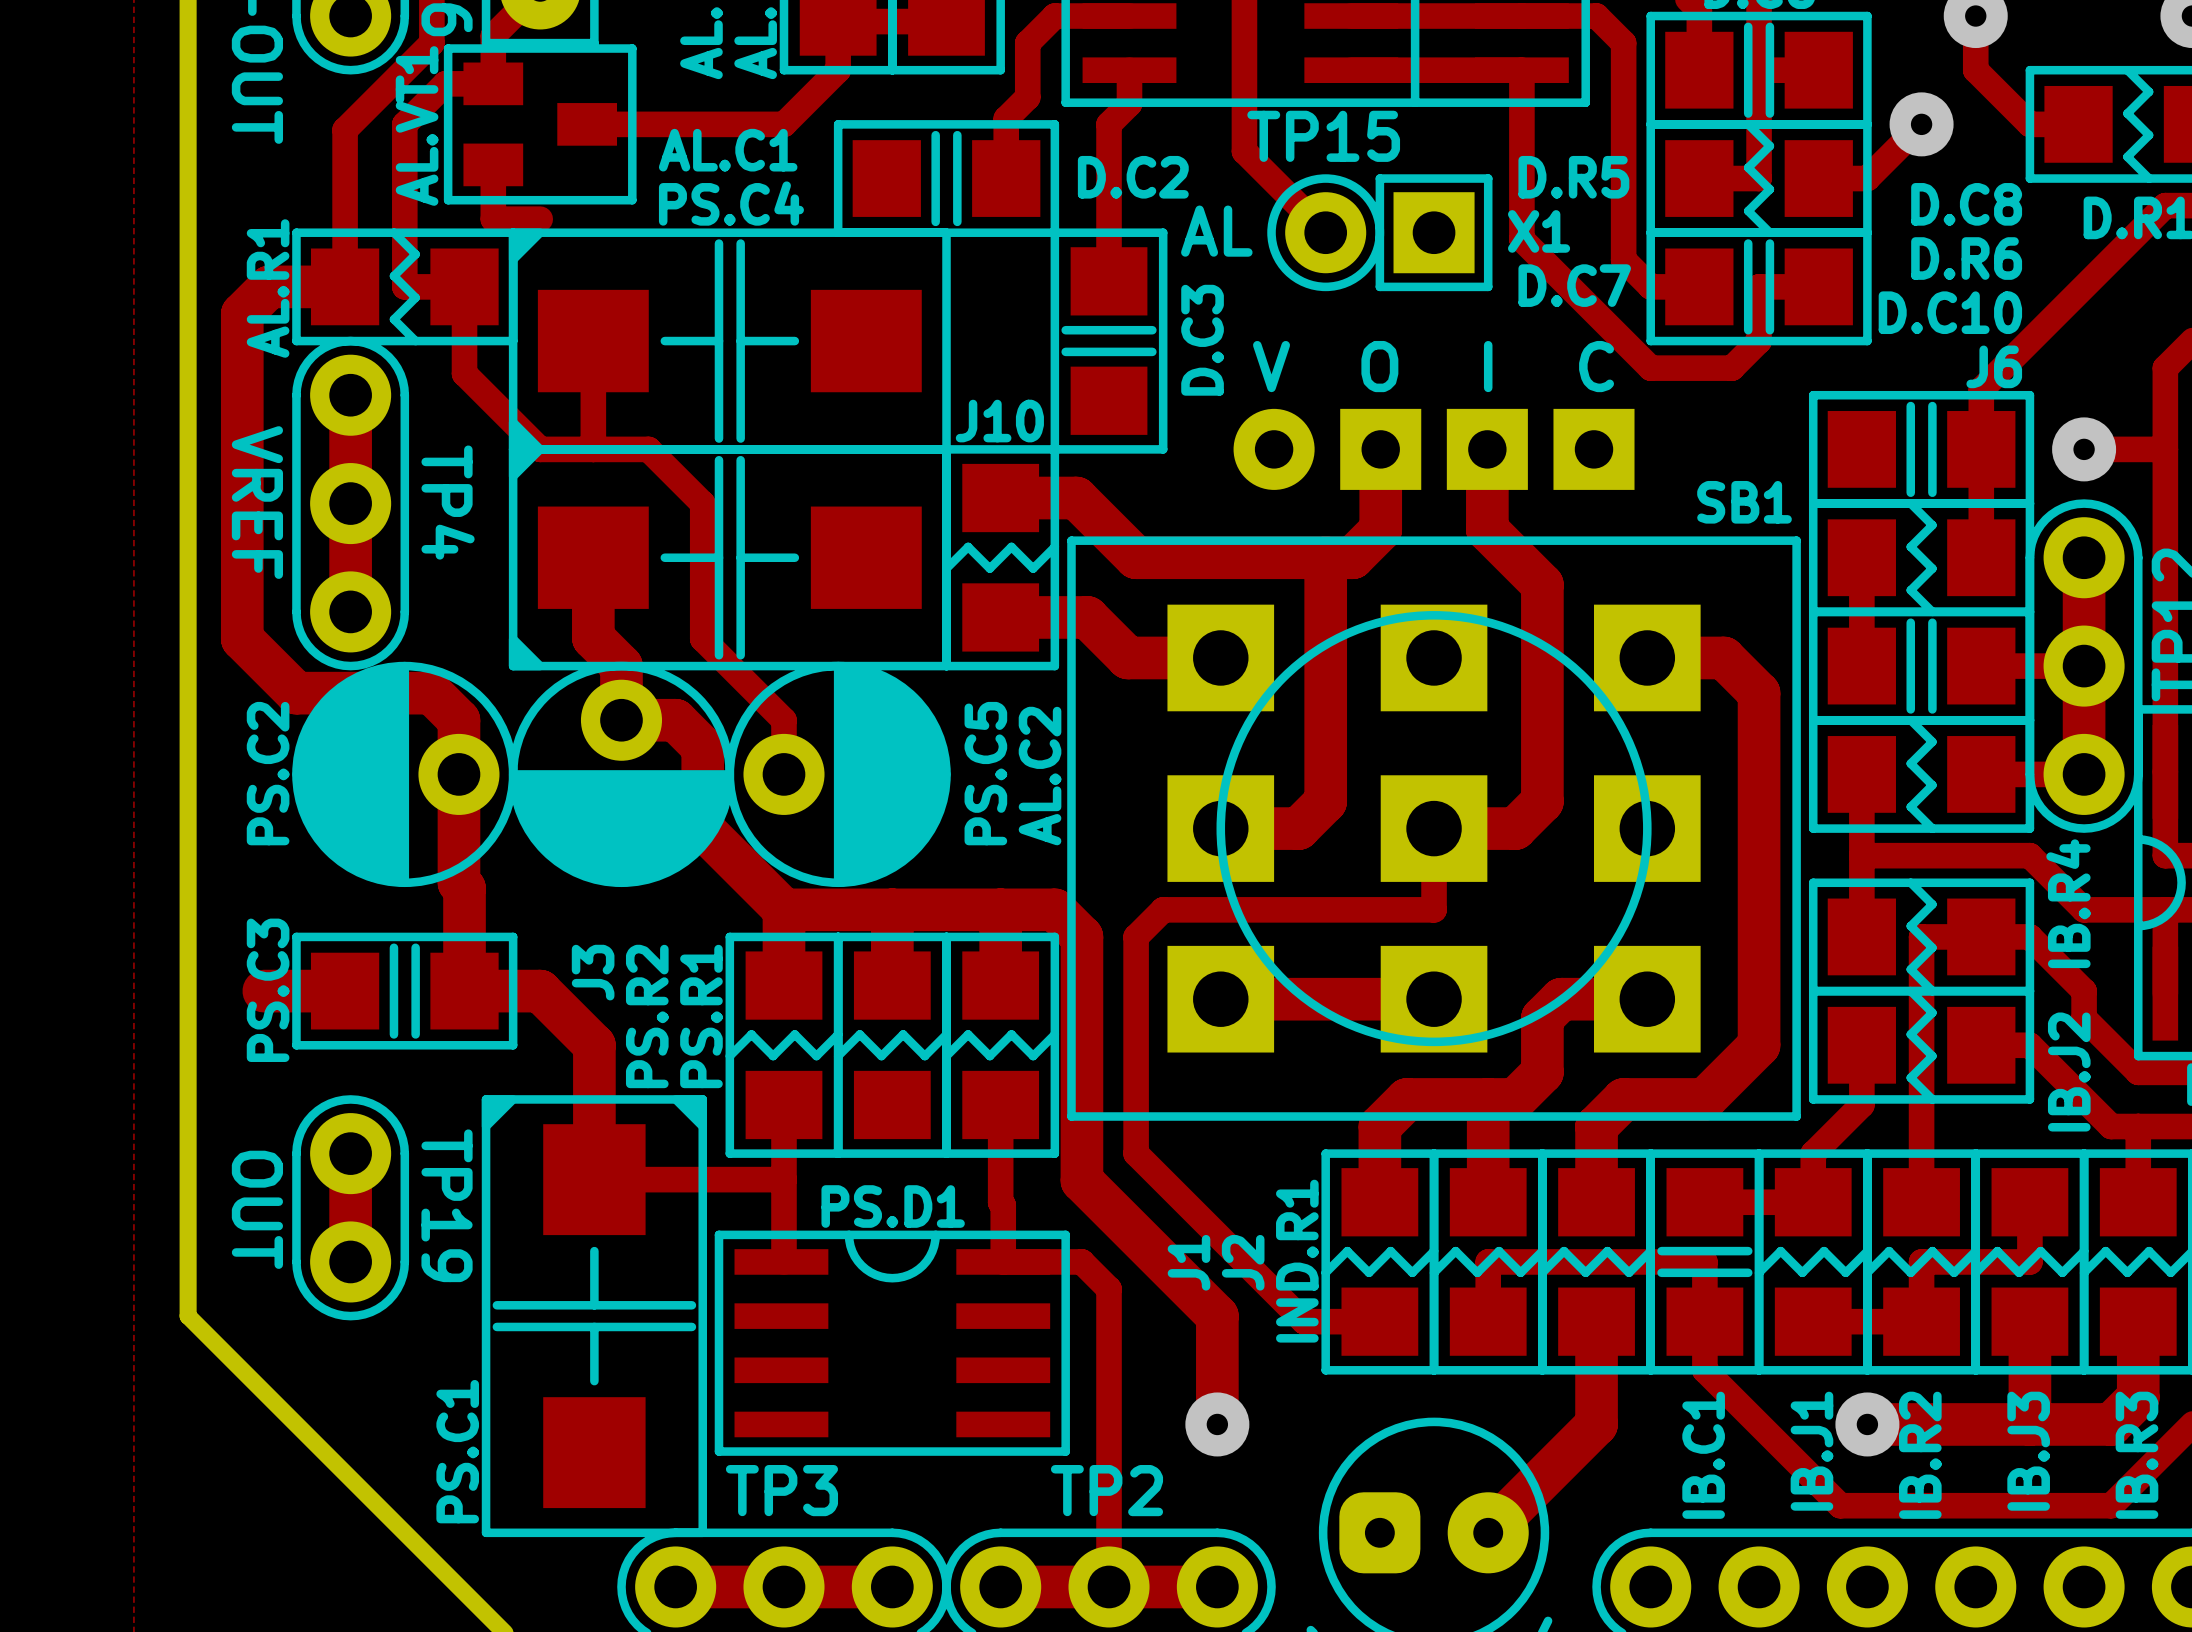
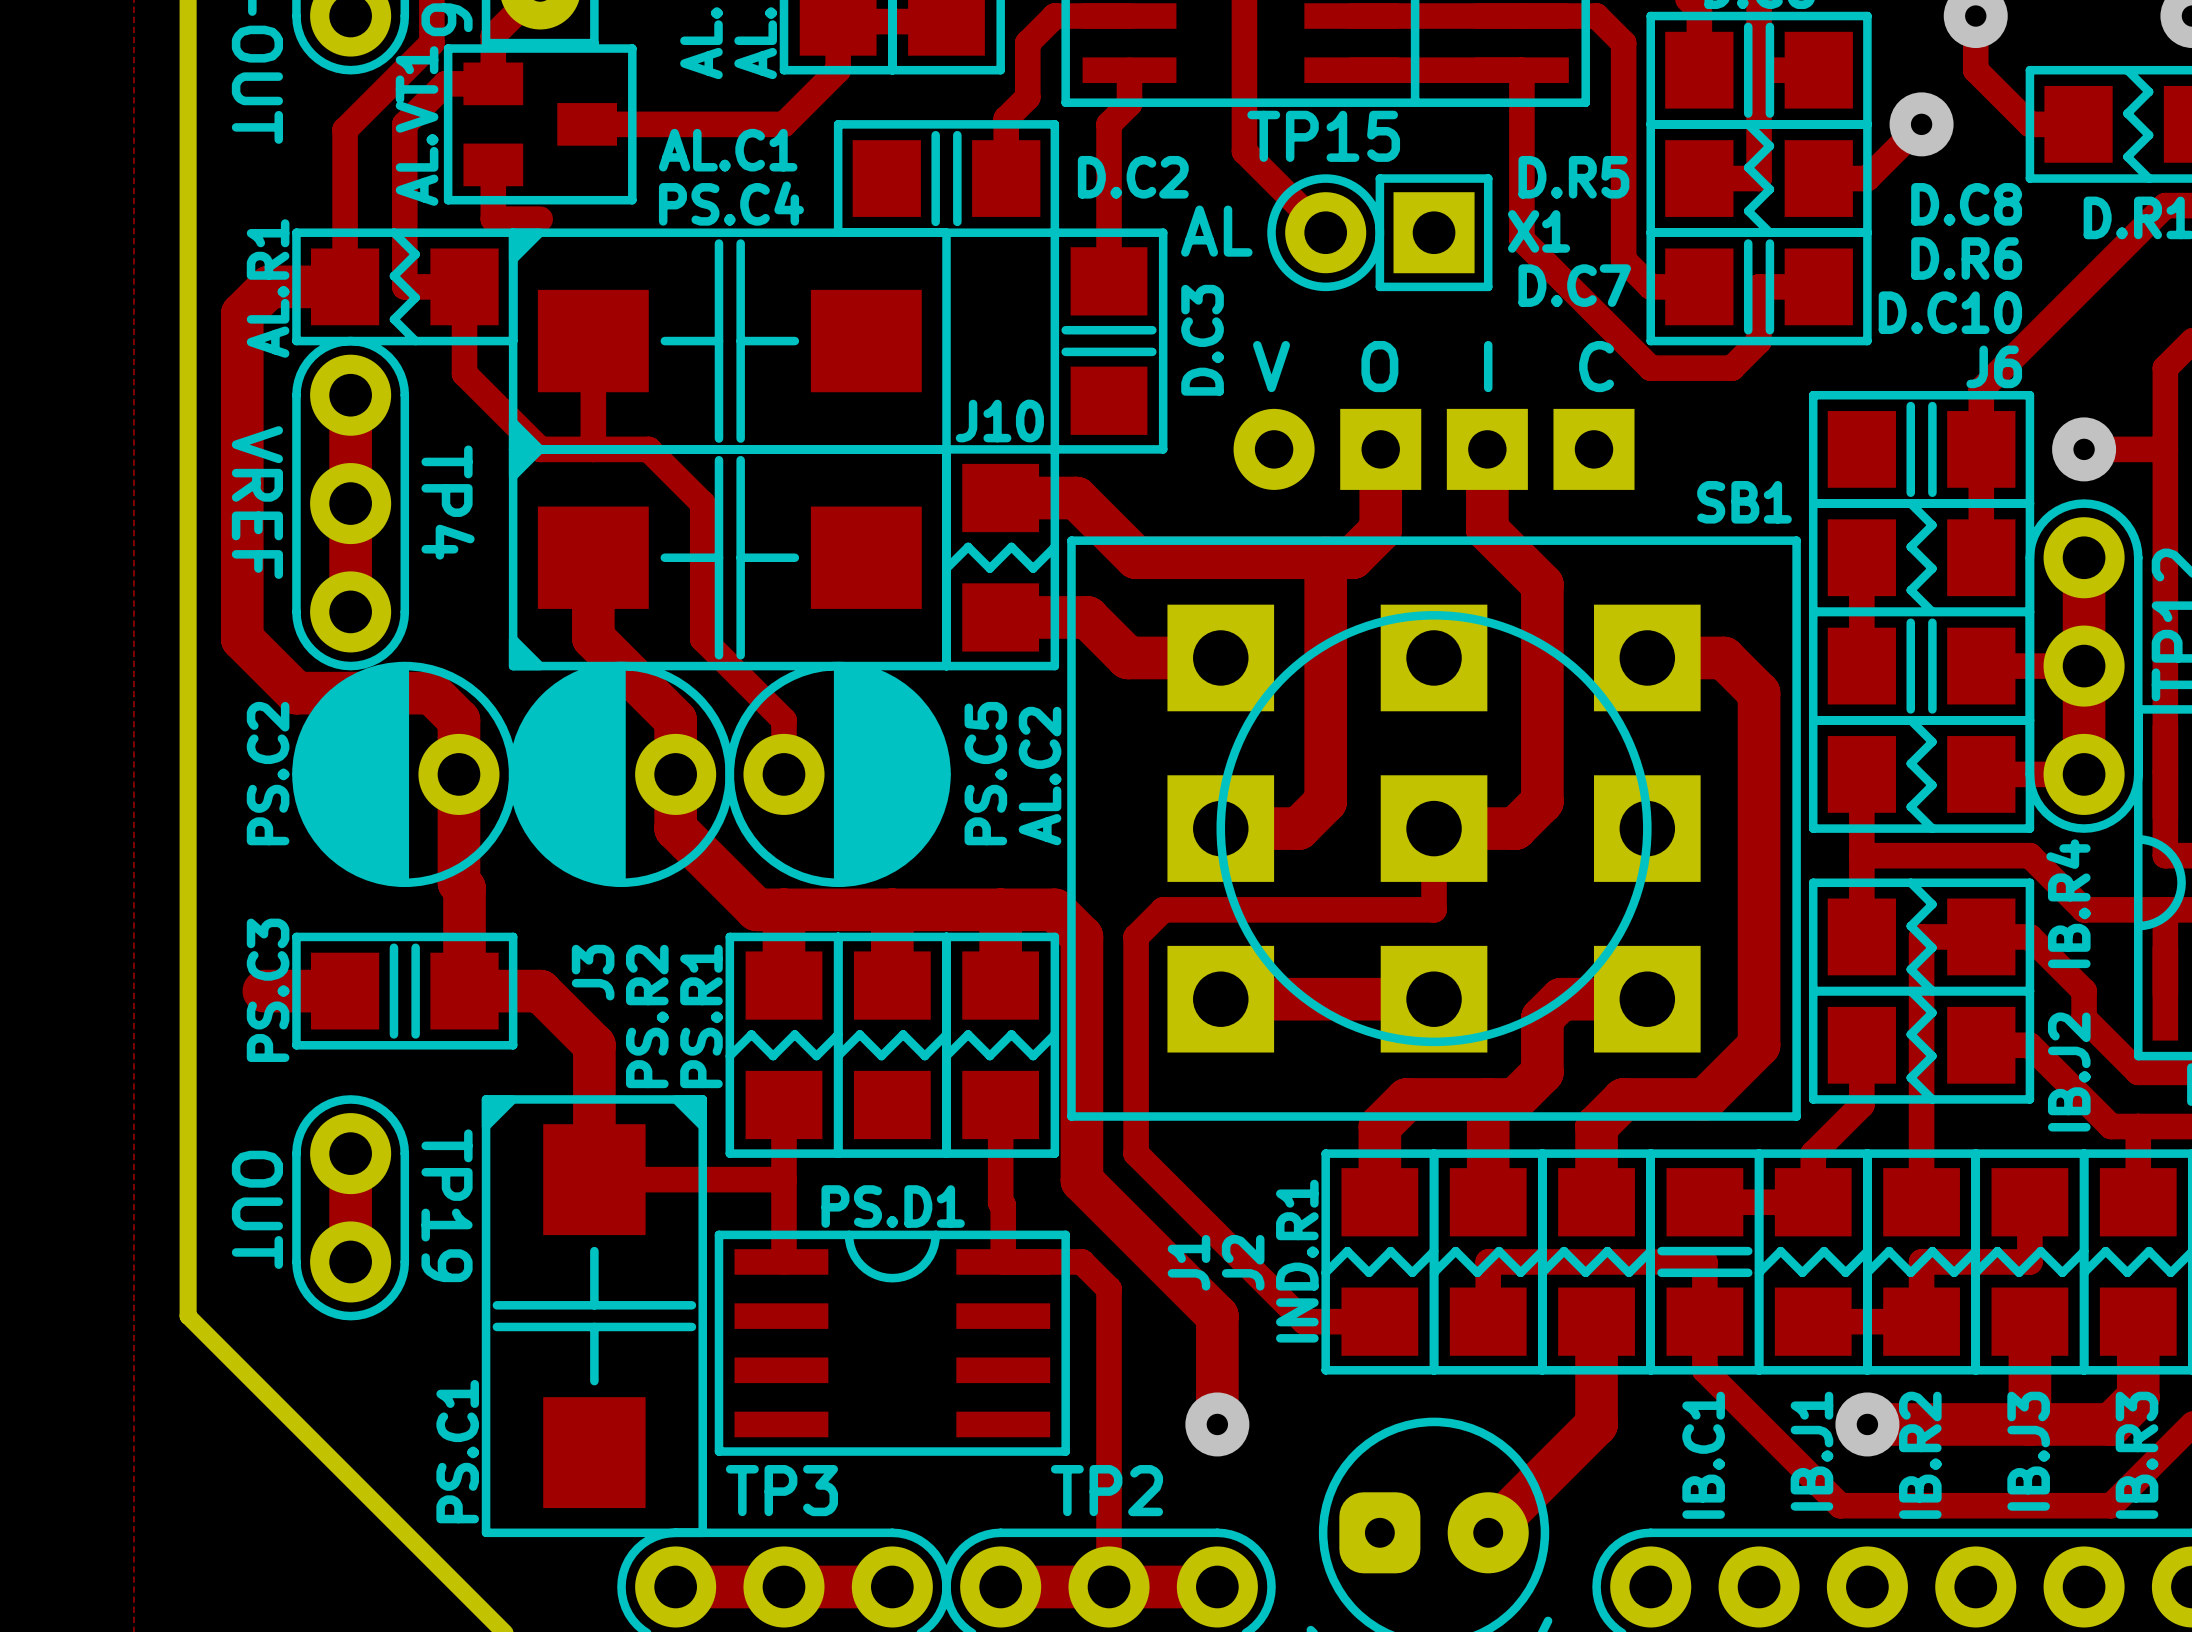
track: (621, 666) (621, 720) (675, 720) (702, 747) (702, 828) (783, 909) -> (621, 666) (675, 720) (675, 828) (756, 909) (783, 909)
PS.C5 rotation: 0° (621, 774) -> 90° clockwise (621, 774)

